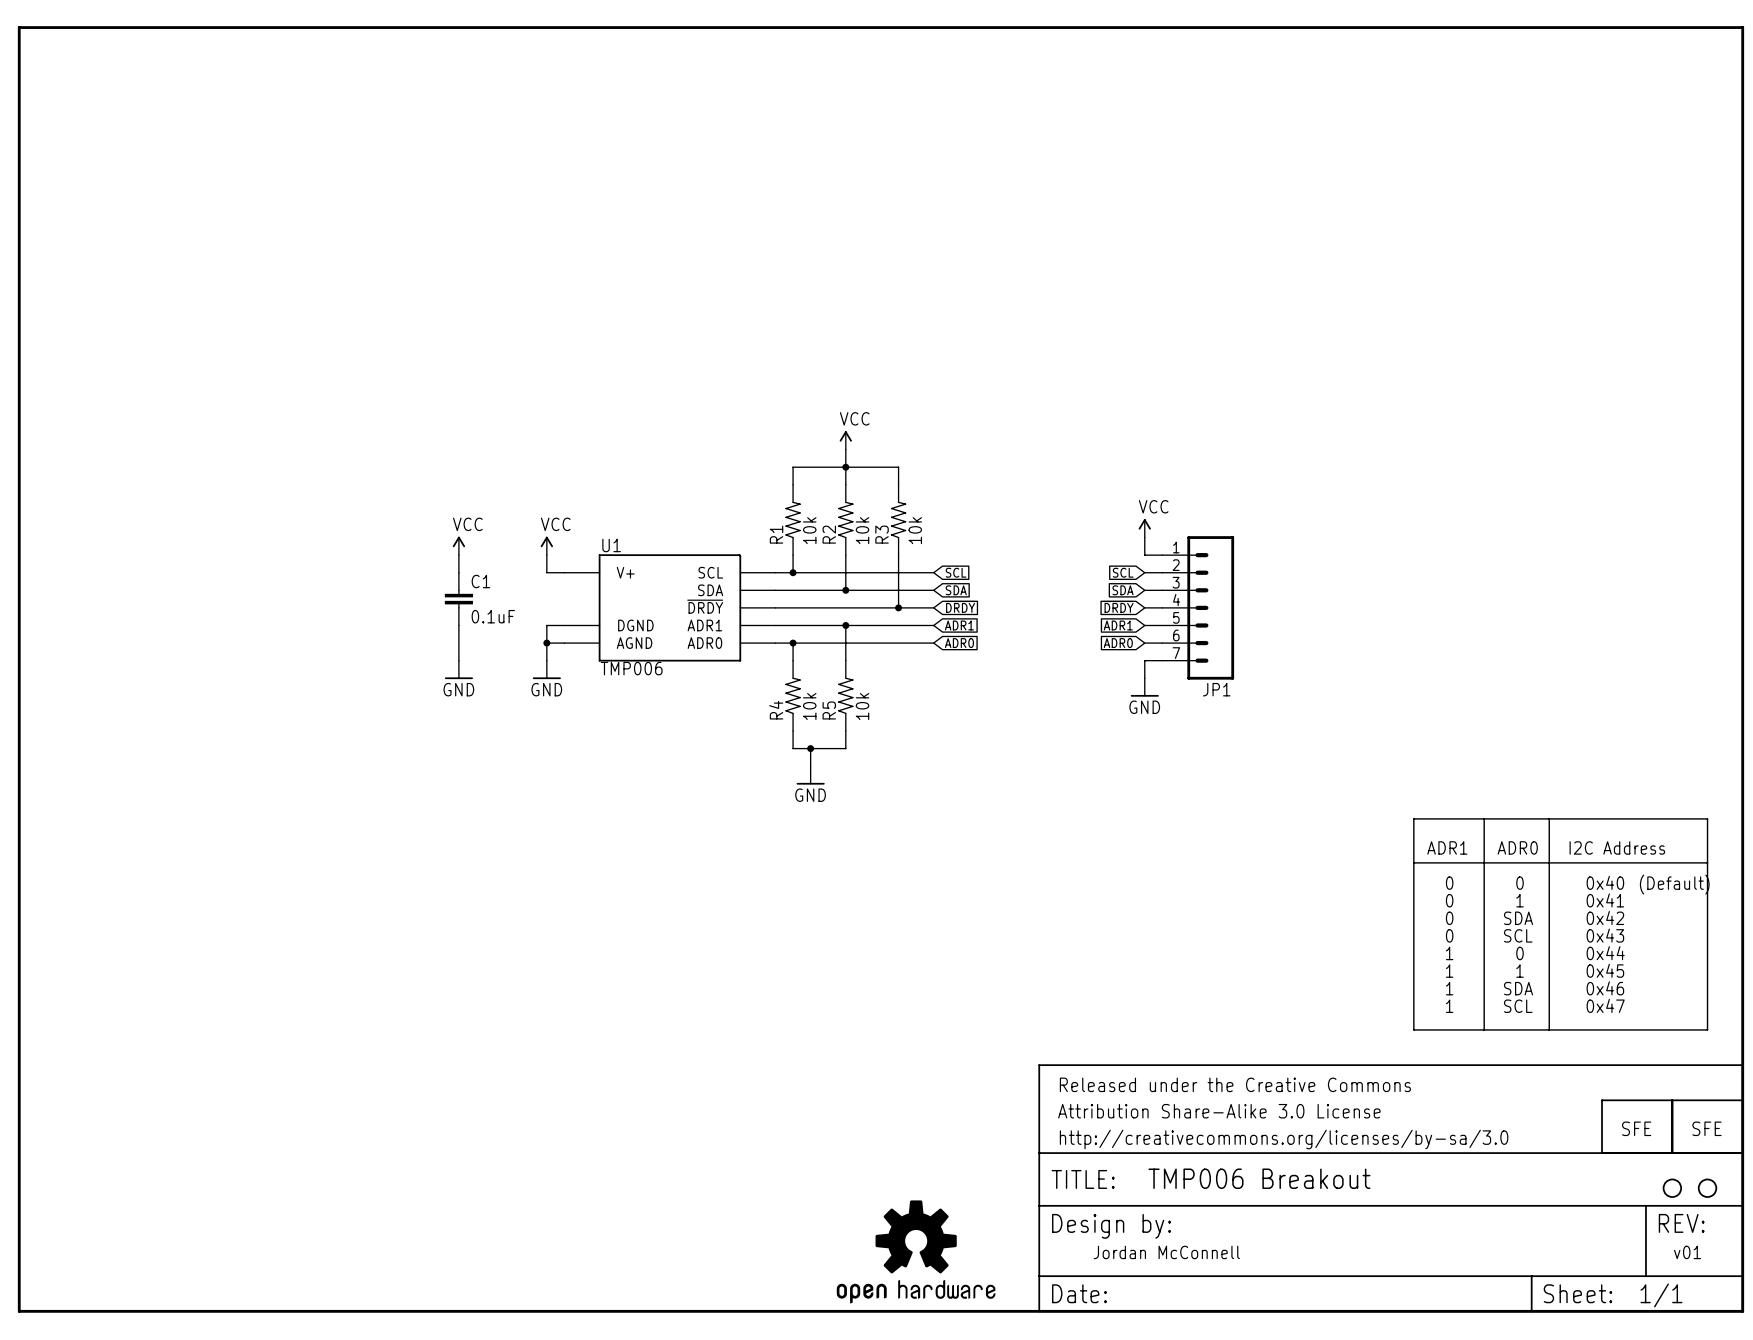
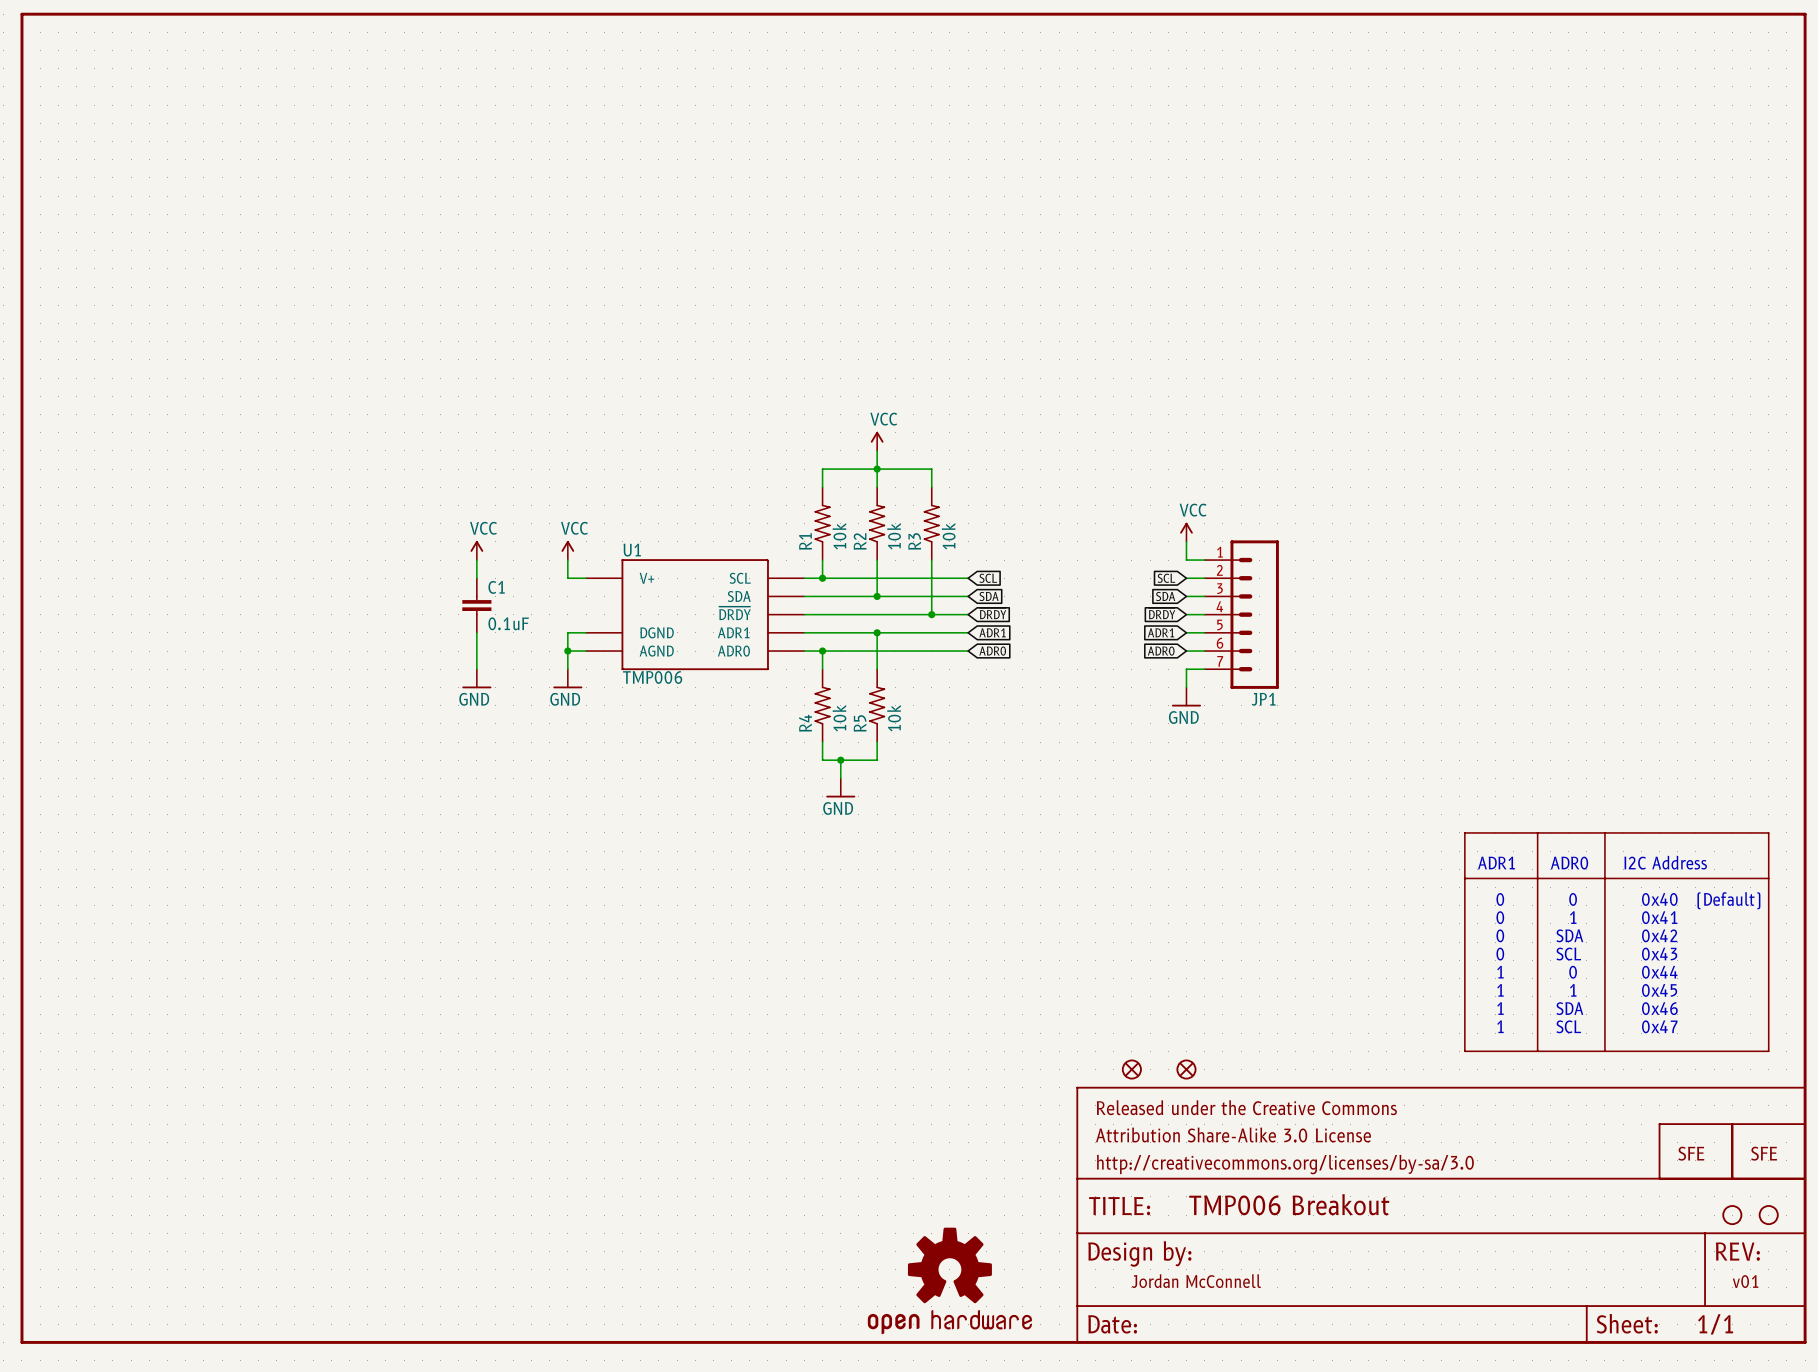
part: none -> (1131, 1069)
part: none -> (1186, 1069)

